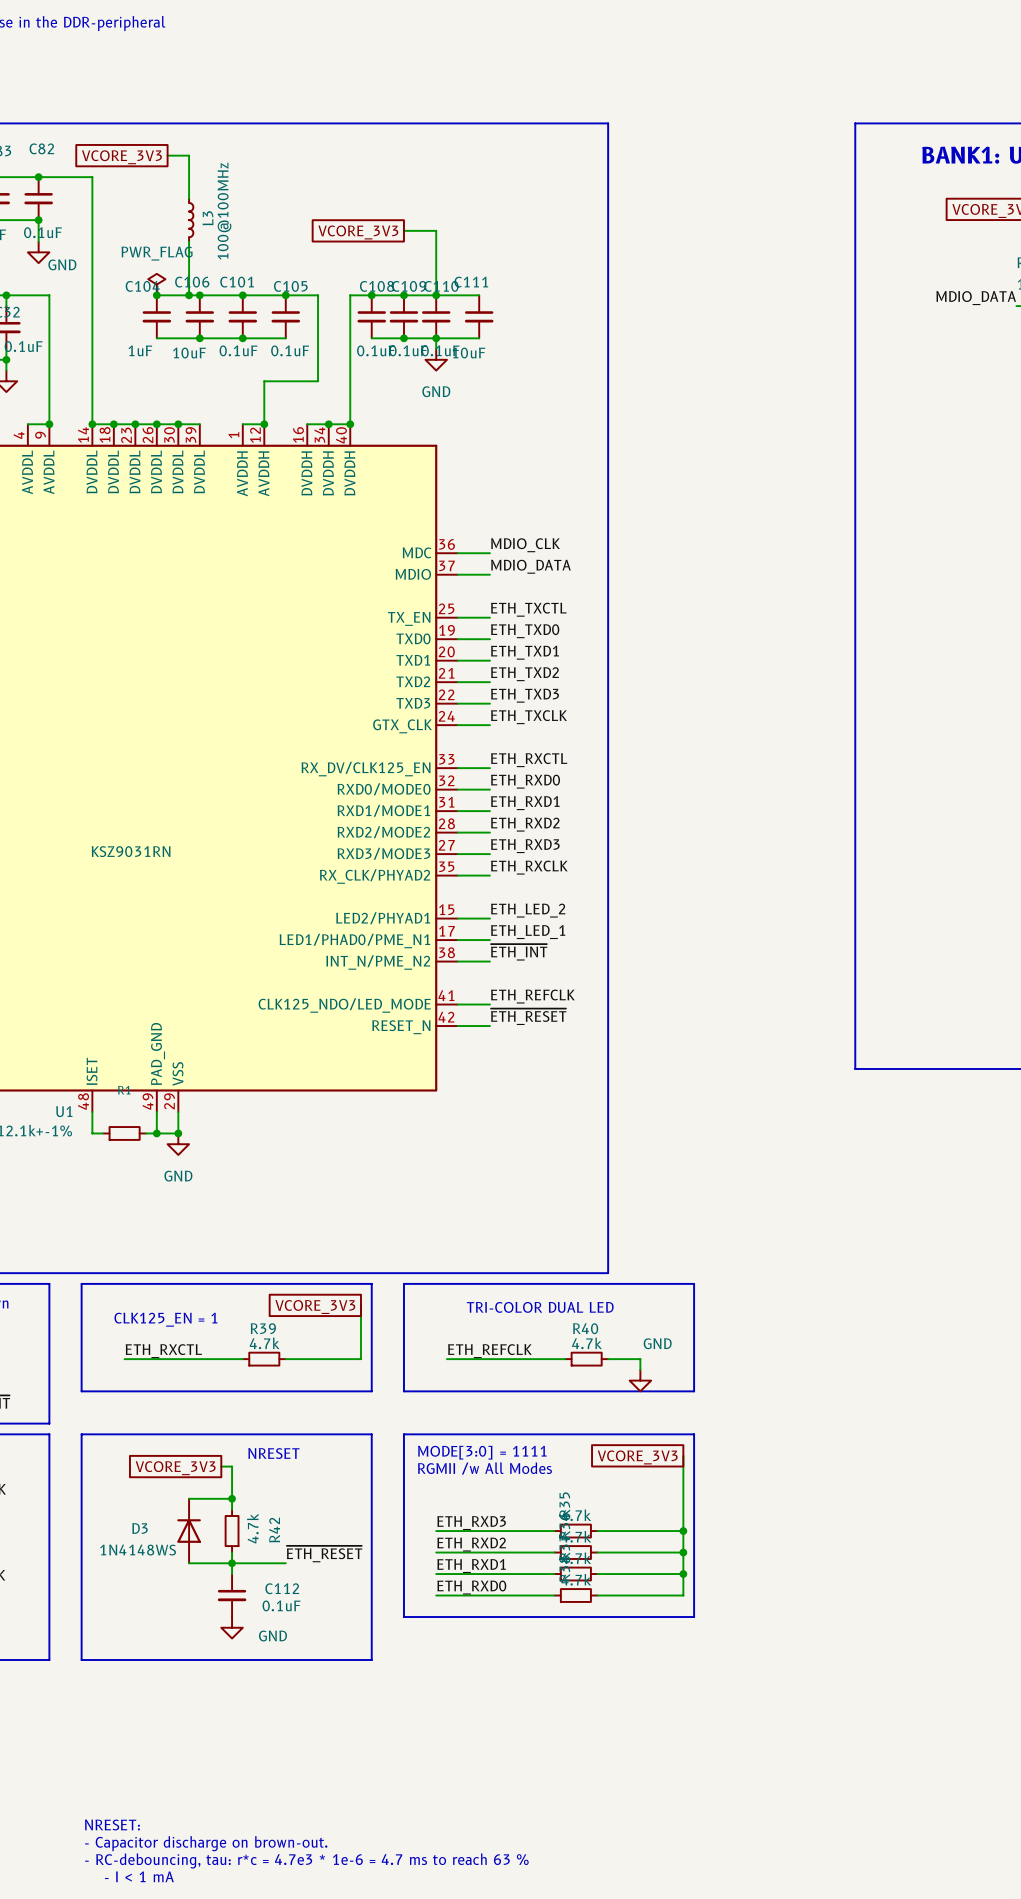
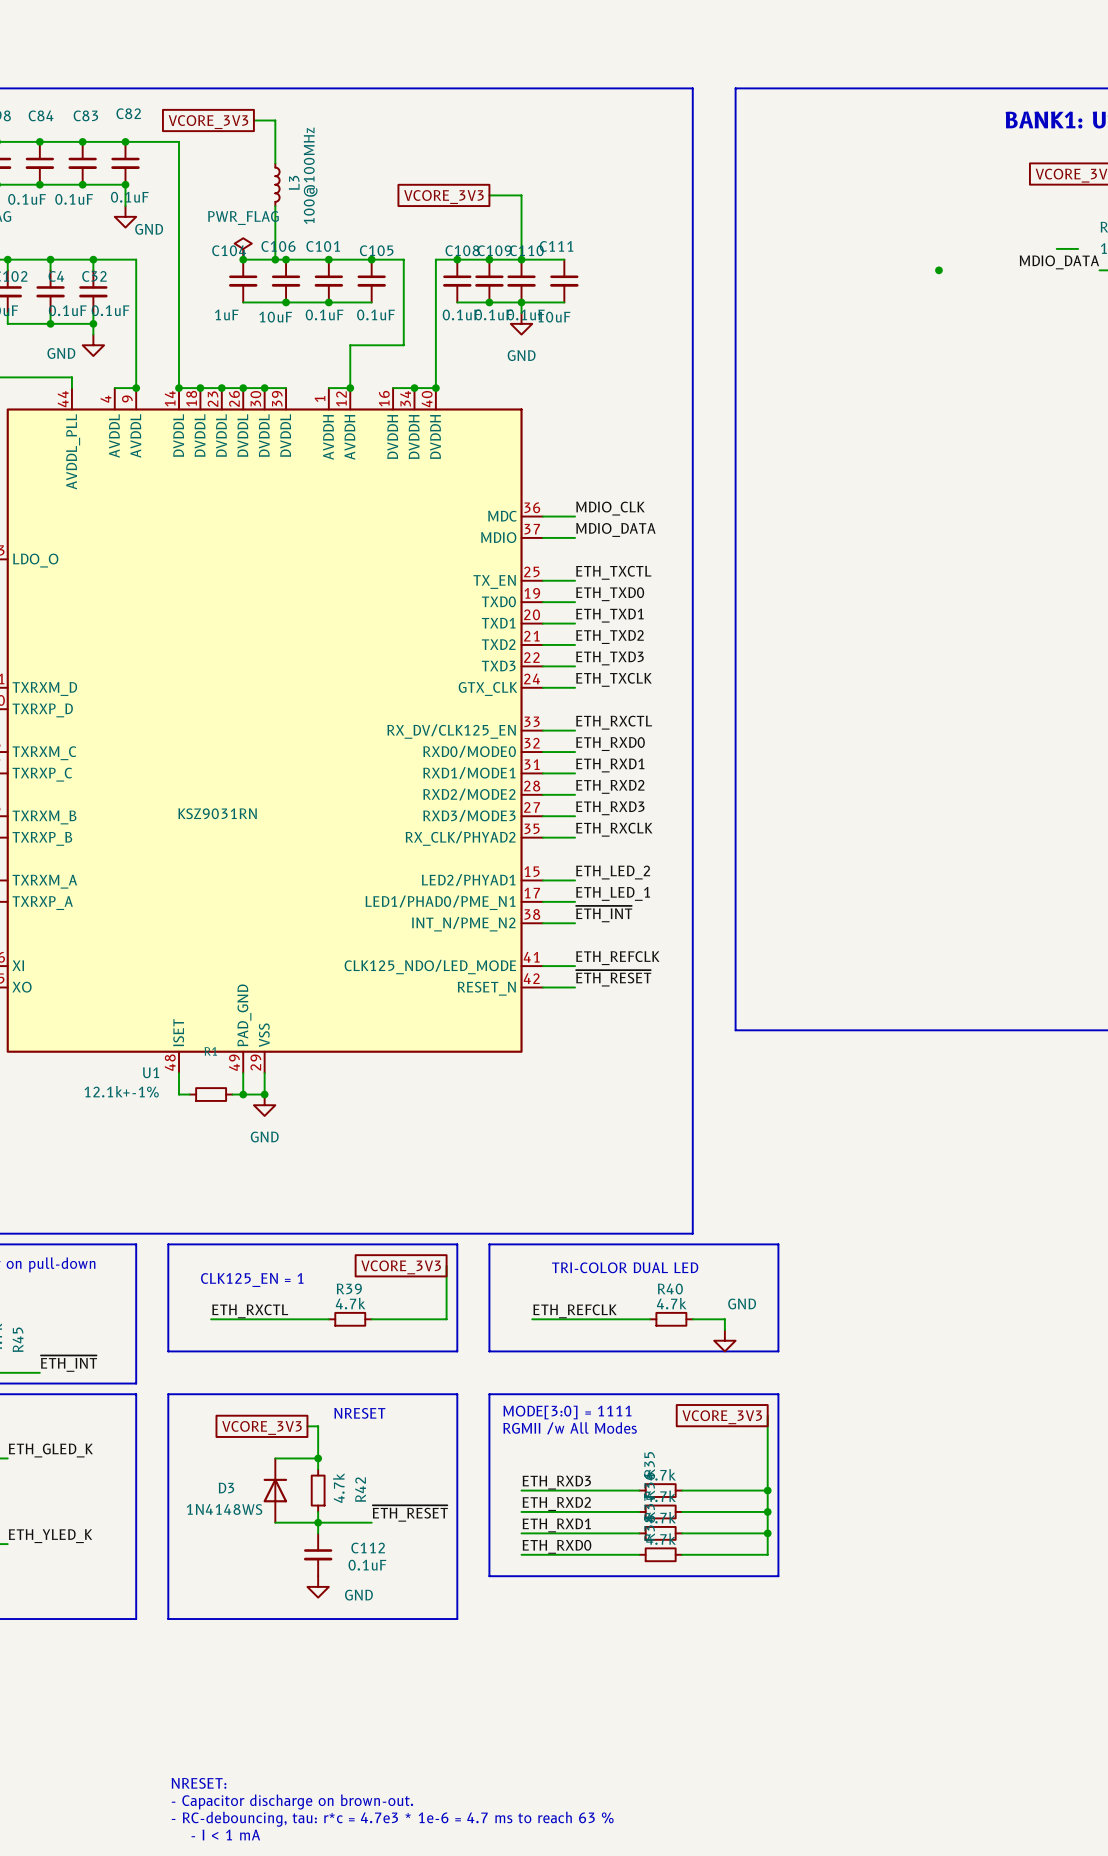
line: (855, 123) (855, 1069) -> (938, 88) (735, 88) (735, 1030) (938, 1030)
wire: none -> (1056, 248) (1078, 248)
junction: none -> (938, 270)

